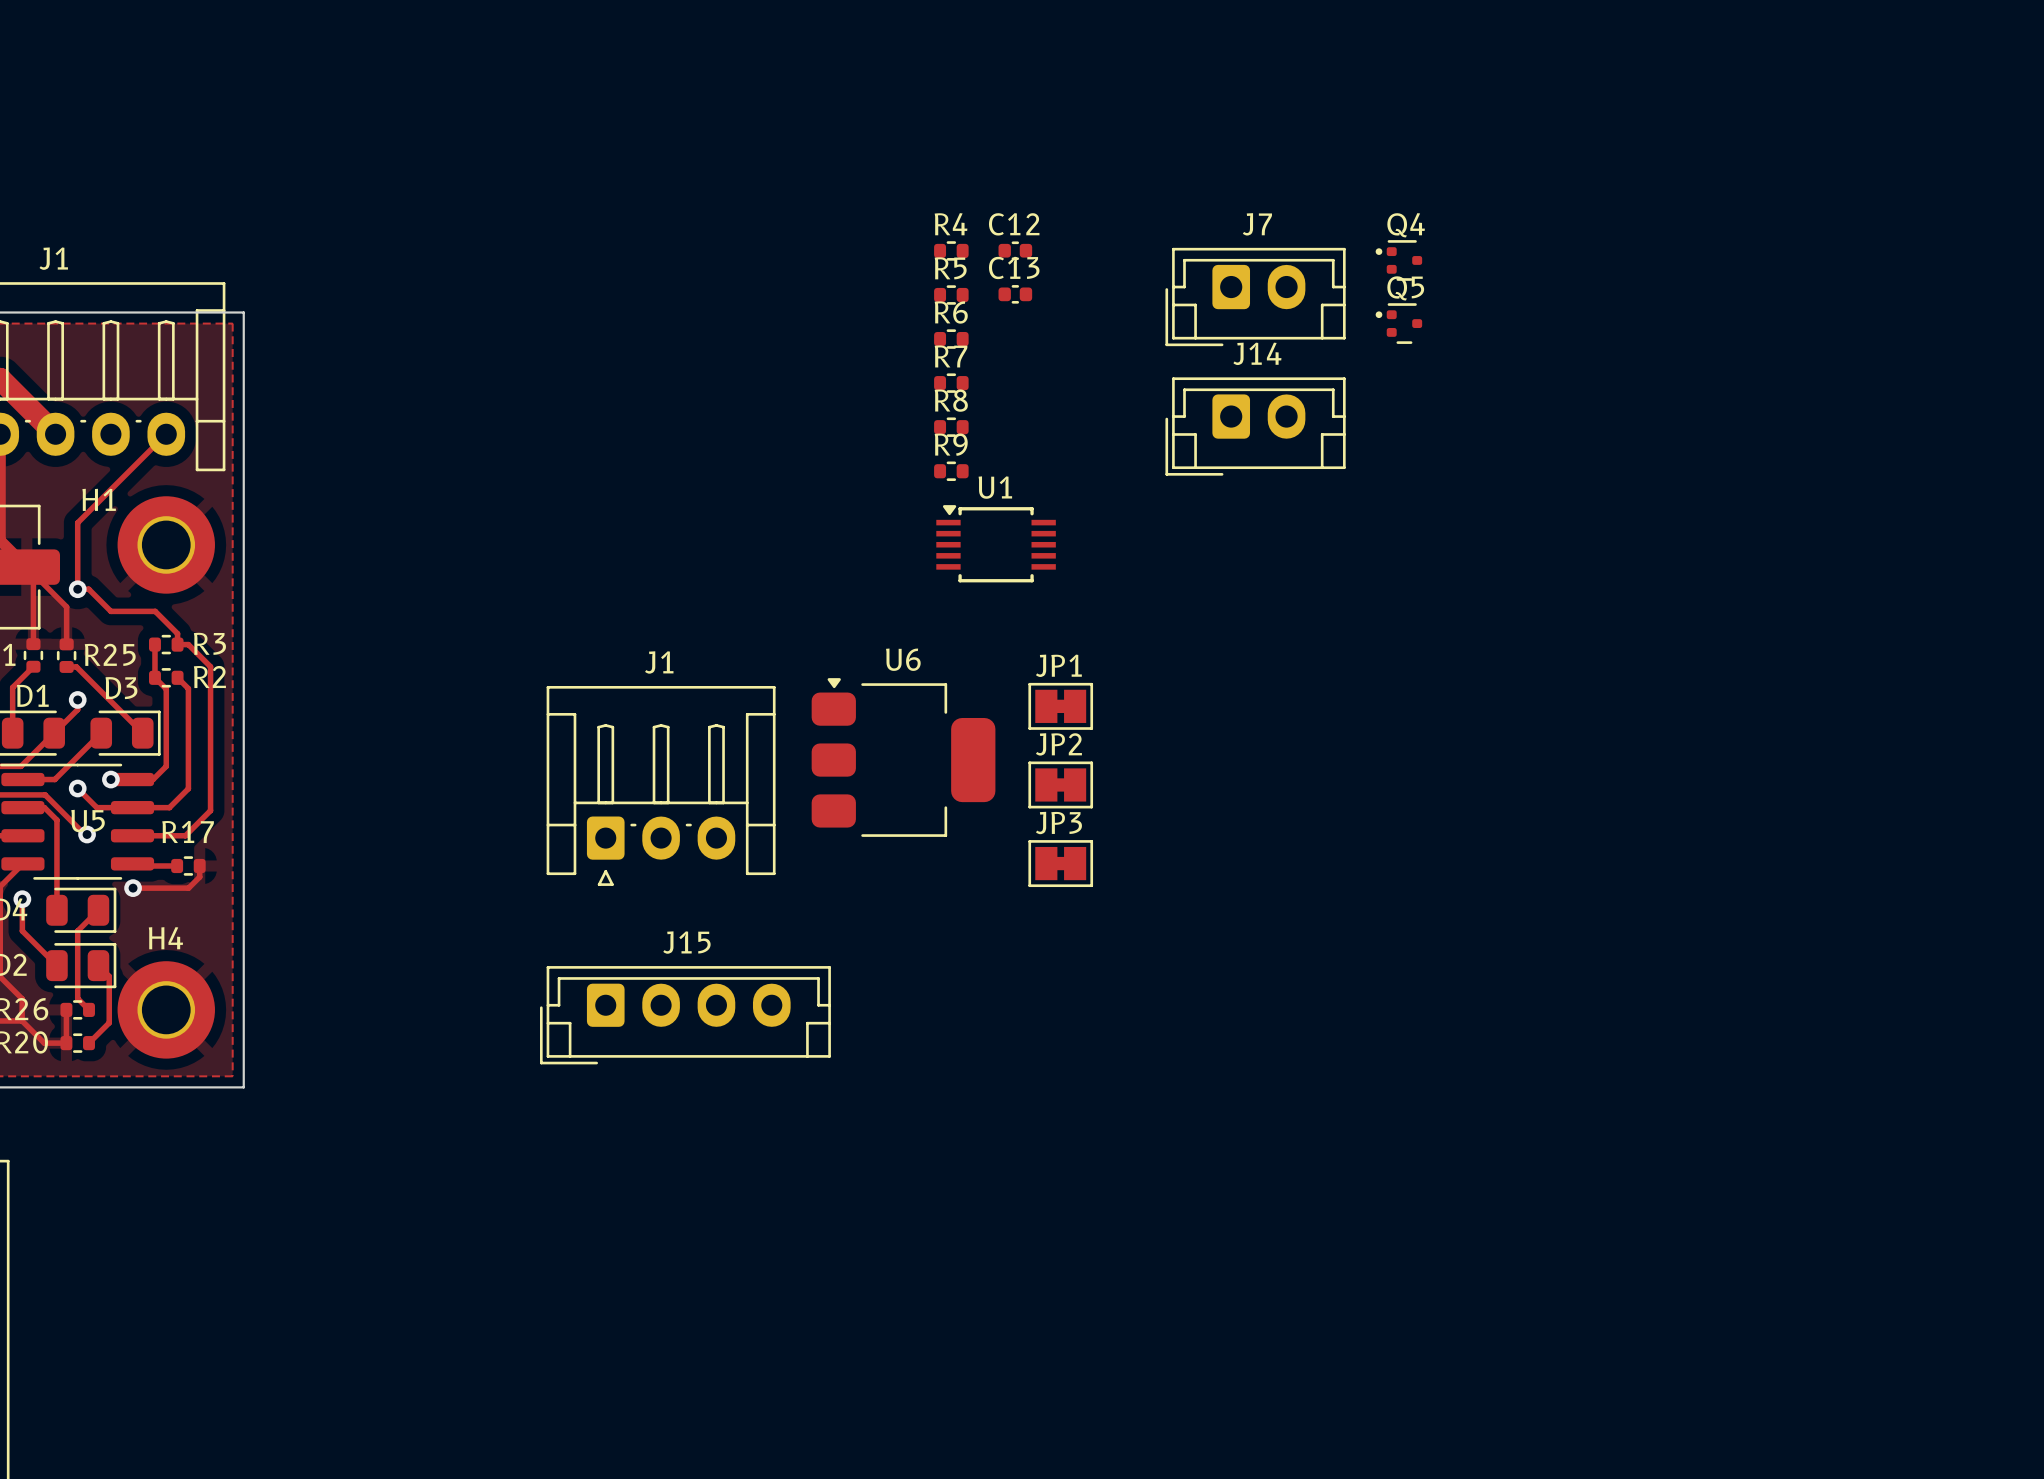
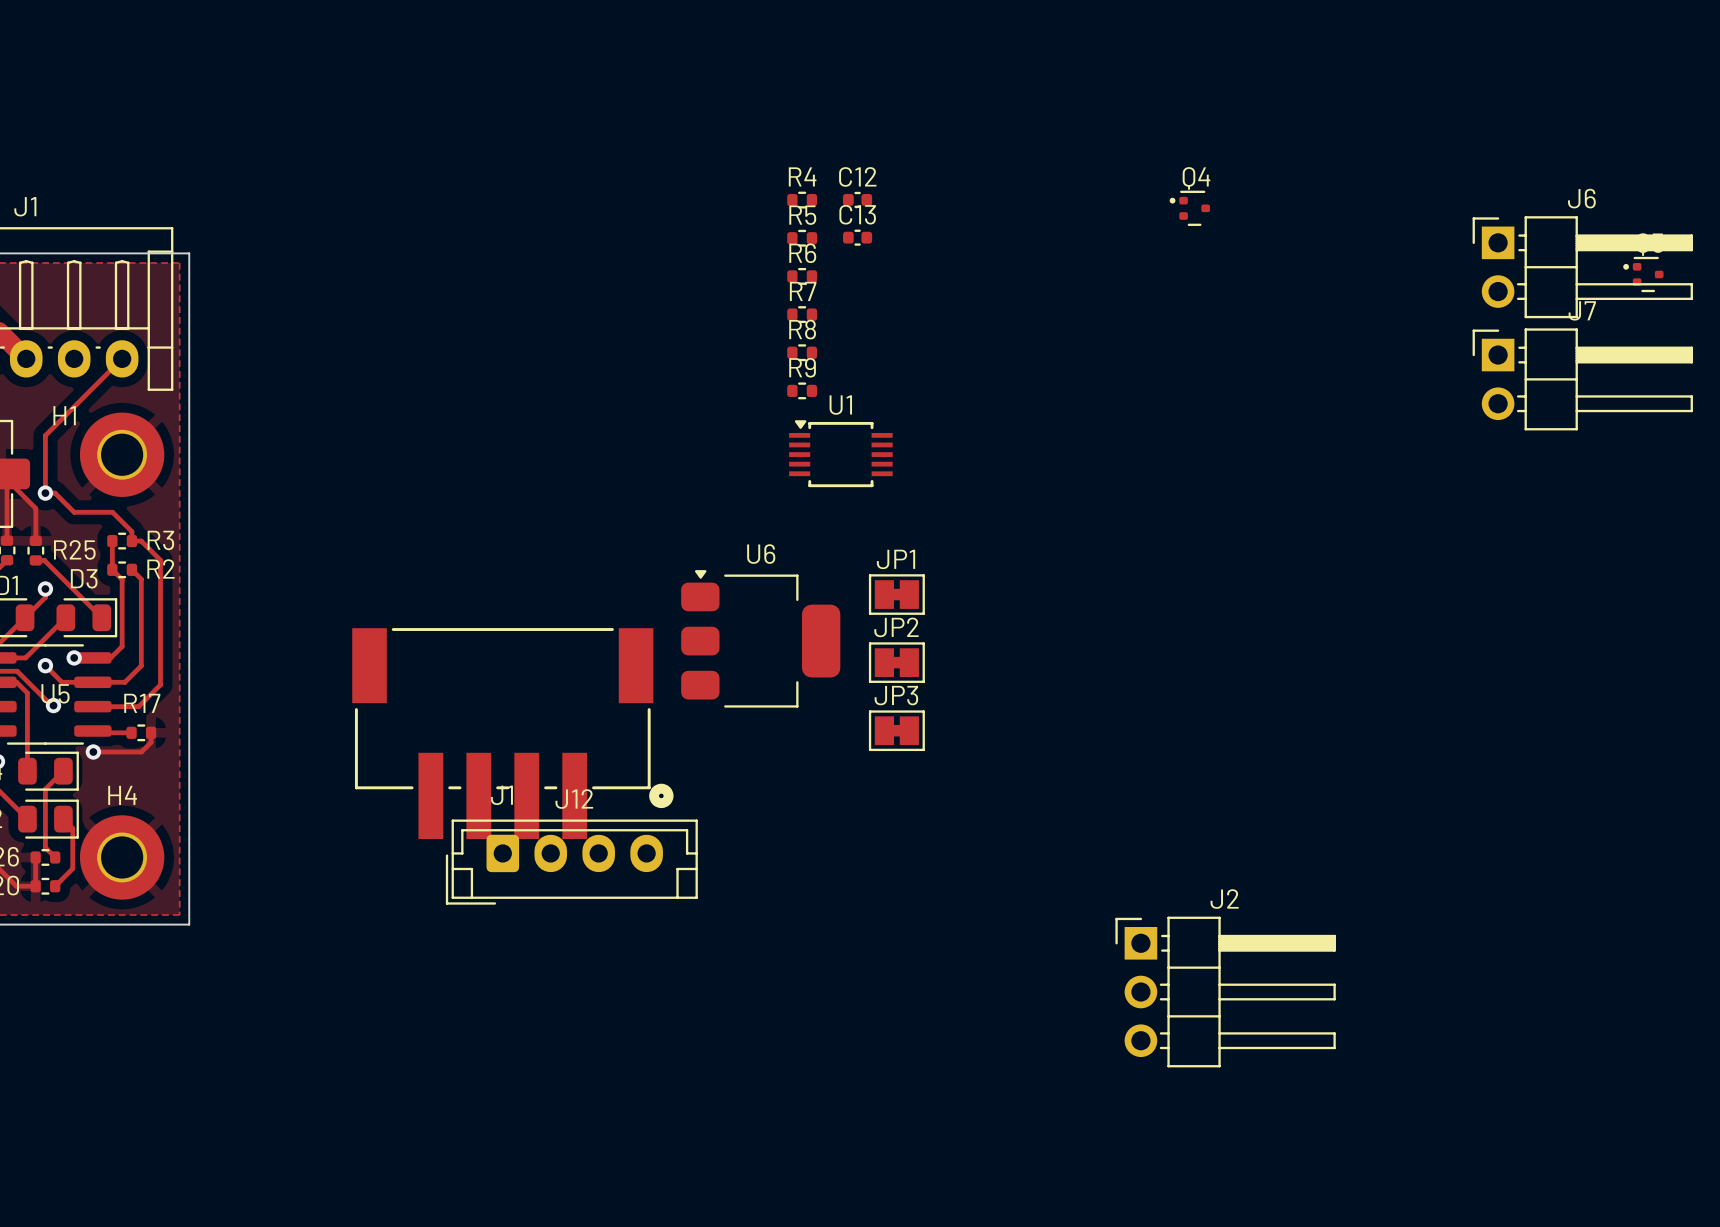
J7 footprint: [1165, 247, 1346, 347] -> [1472, 328, 1693, 431]
Q5 position: (1398, 323) -> (1643, 274)
J6: none -> (1582, 267)
J14: (1255, 426) -> none
J1: (661, 785) -> none
J1: none -> (512, 733)
J15 name: J15 (686, 942) -> J12 (574, 799)
J2: none -> (1225, 992)

